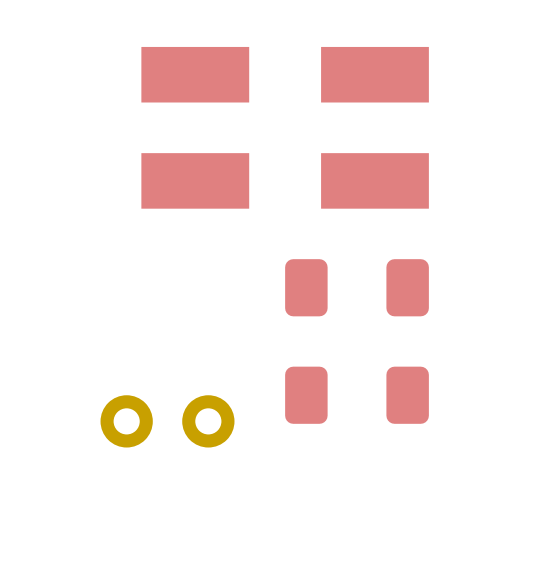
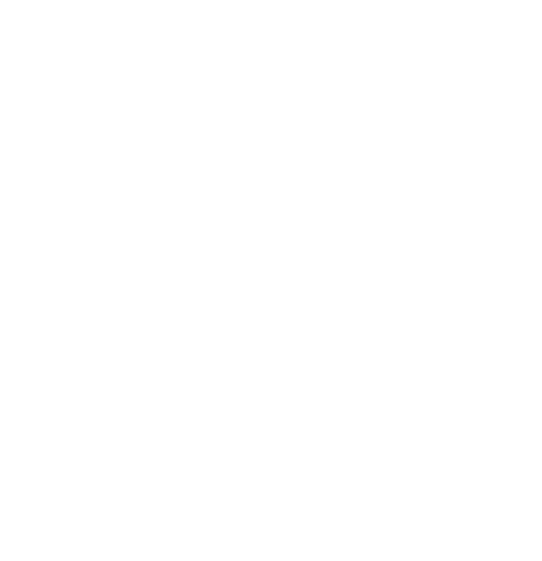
part: (285, 74) -> none
part: (285, 180) -> none
part: (357, 287) -> none
part: (357, 395) -> none
part: (167, 421) -> none

